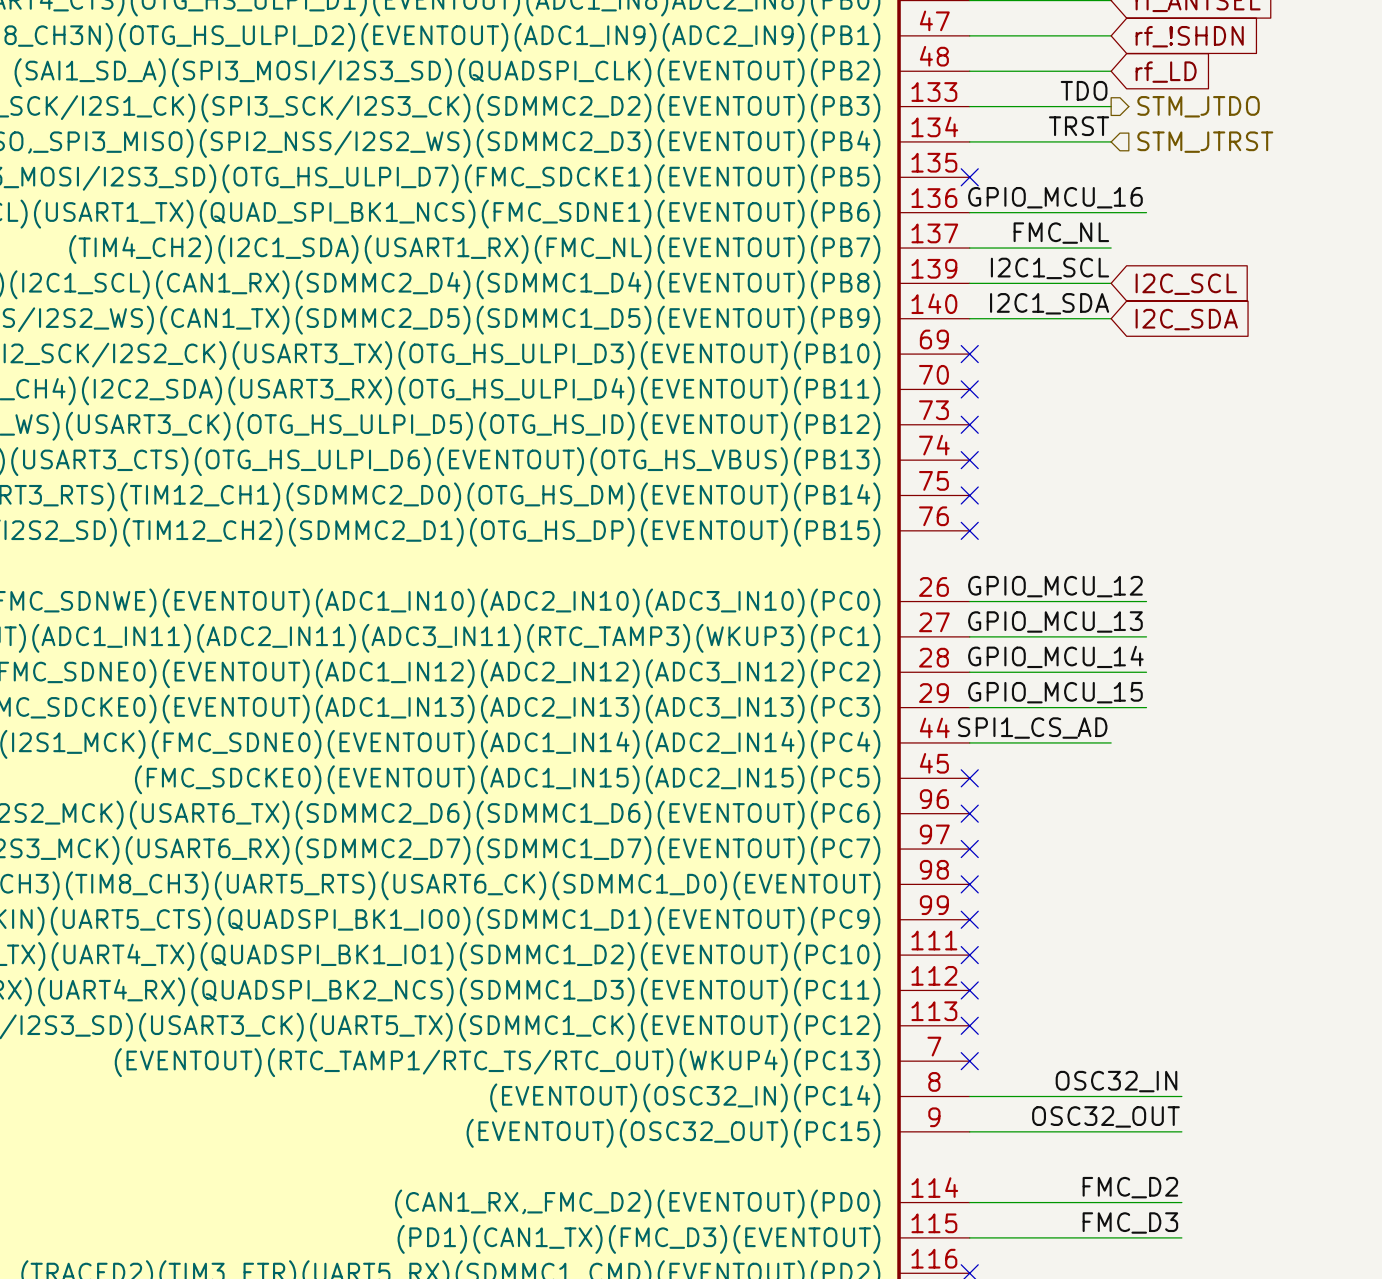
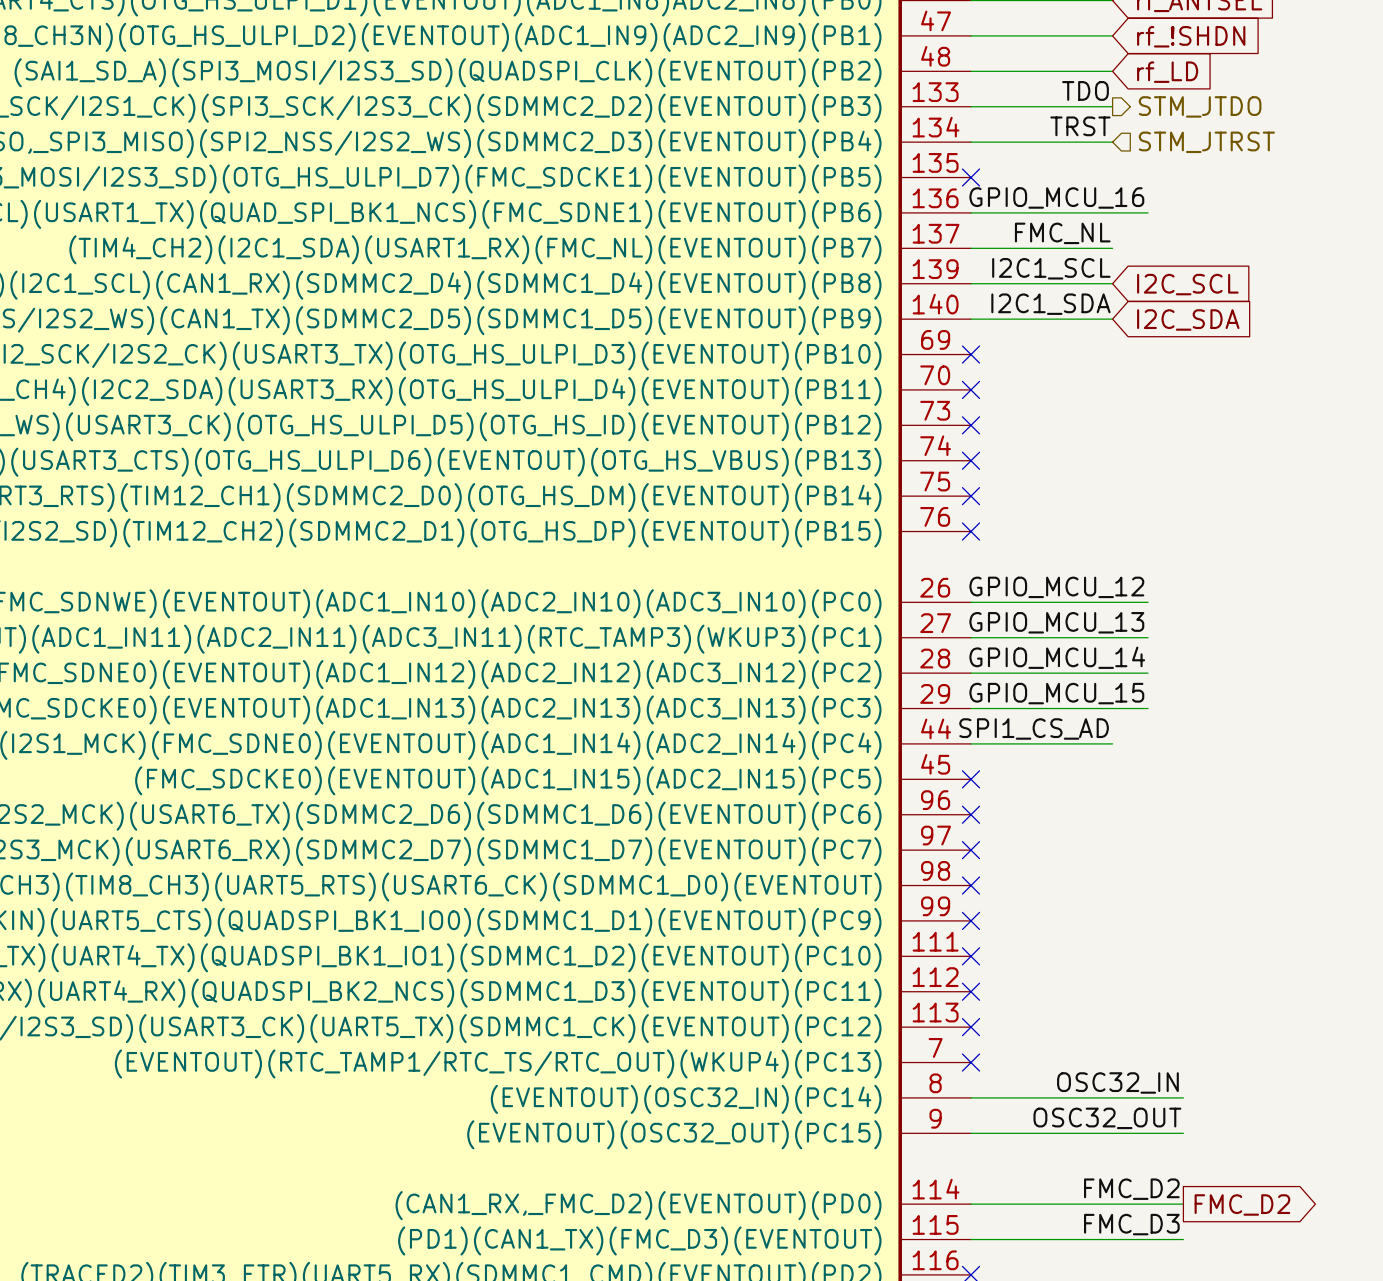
global label: none -> FMC_D2 (1242, 1204)

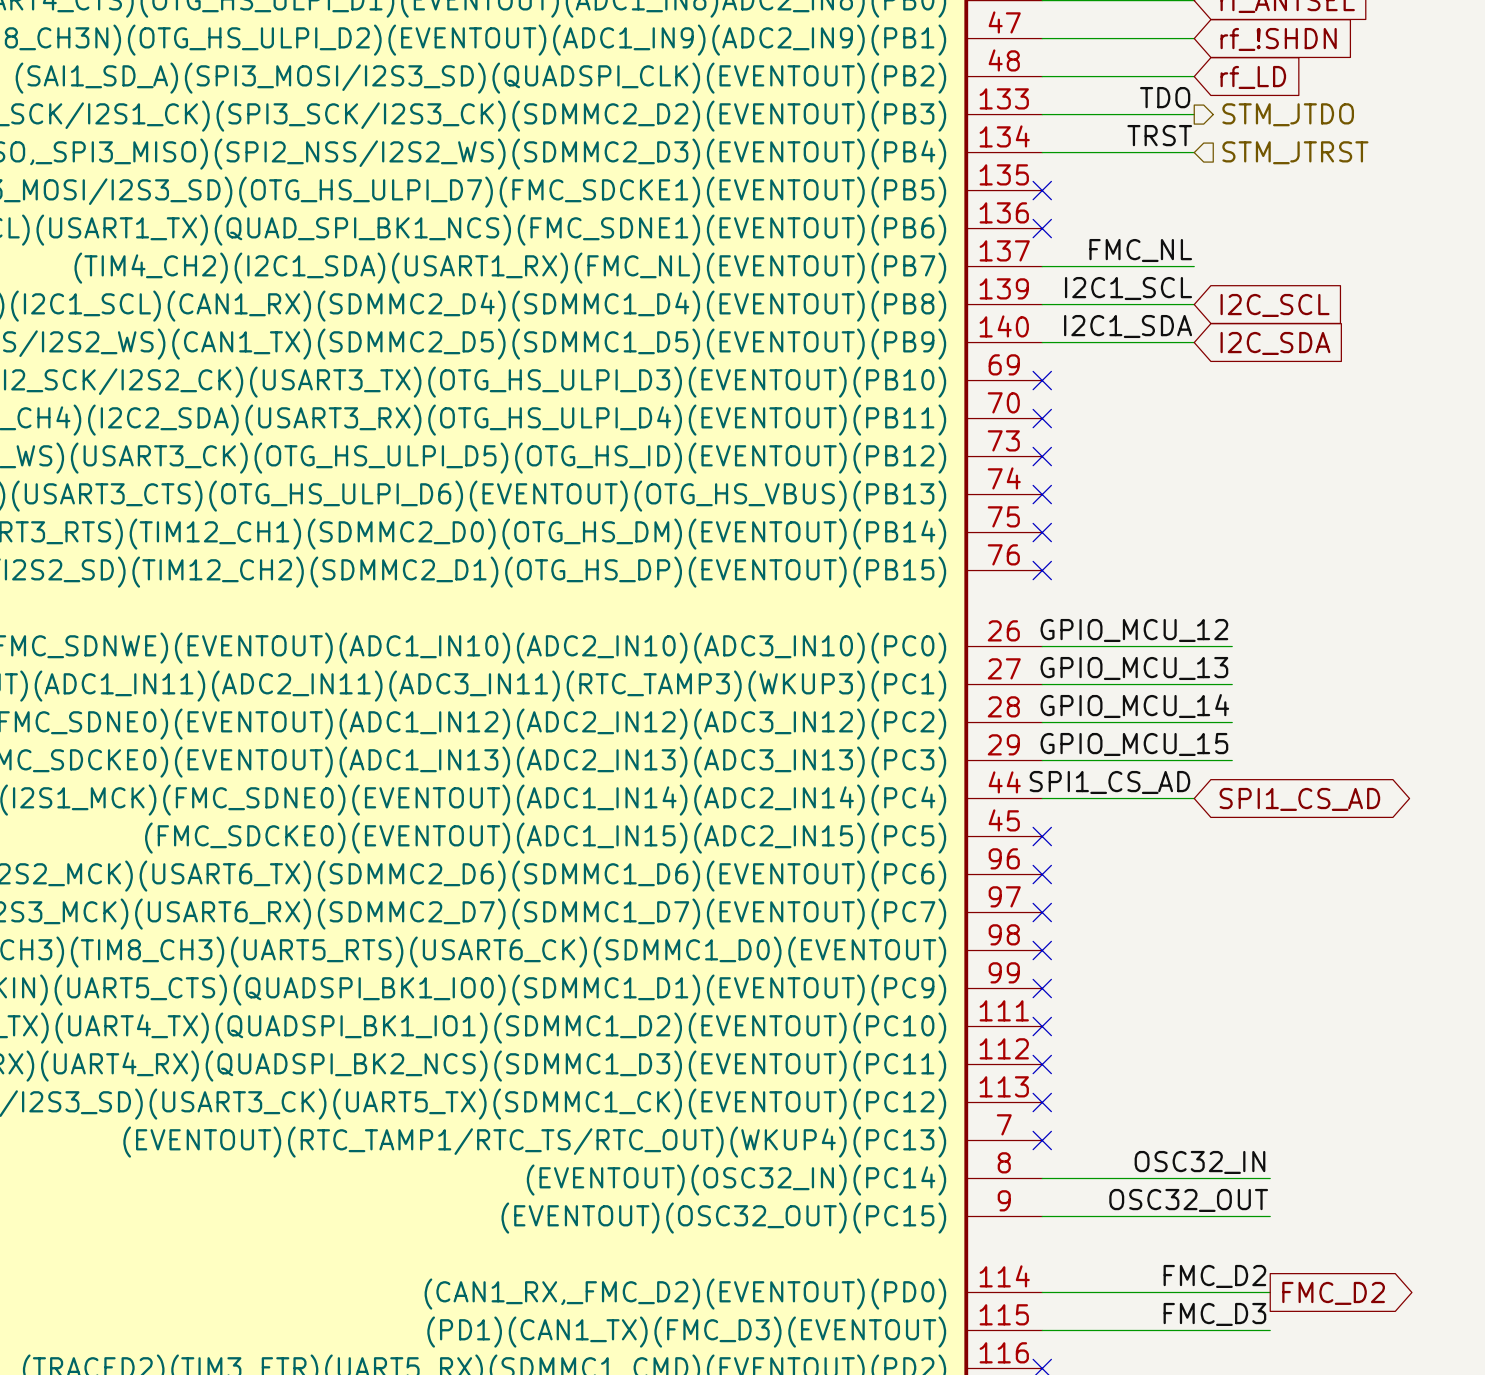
label: GPIO_MCU_16 (1056, 197) -> none
wire: (971, 212) (1148, 212) -> none
no-connect mark: none -> (1042, 228)
global label: none -> SPI1_CS_AD (1299, 799)

